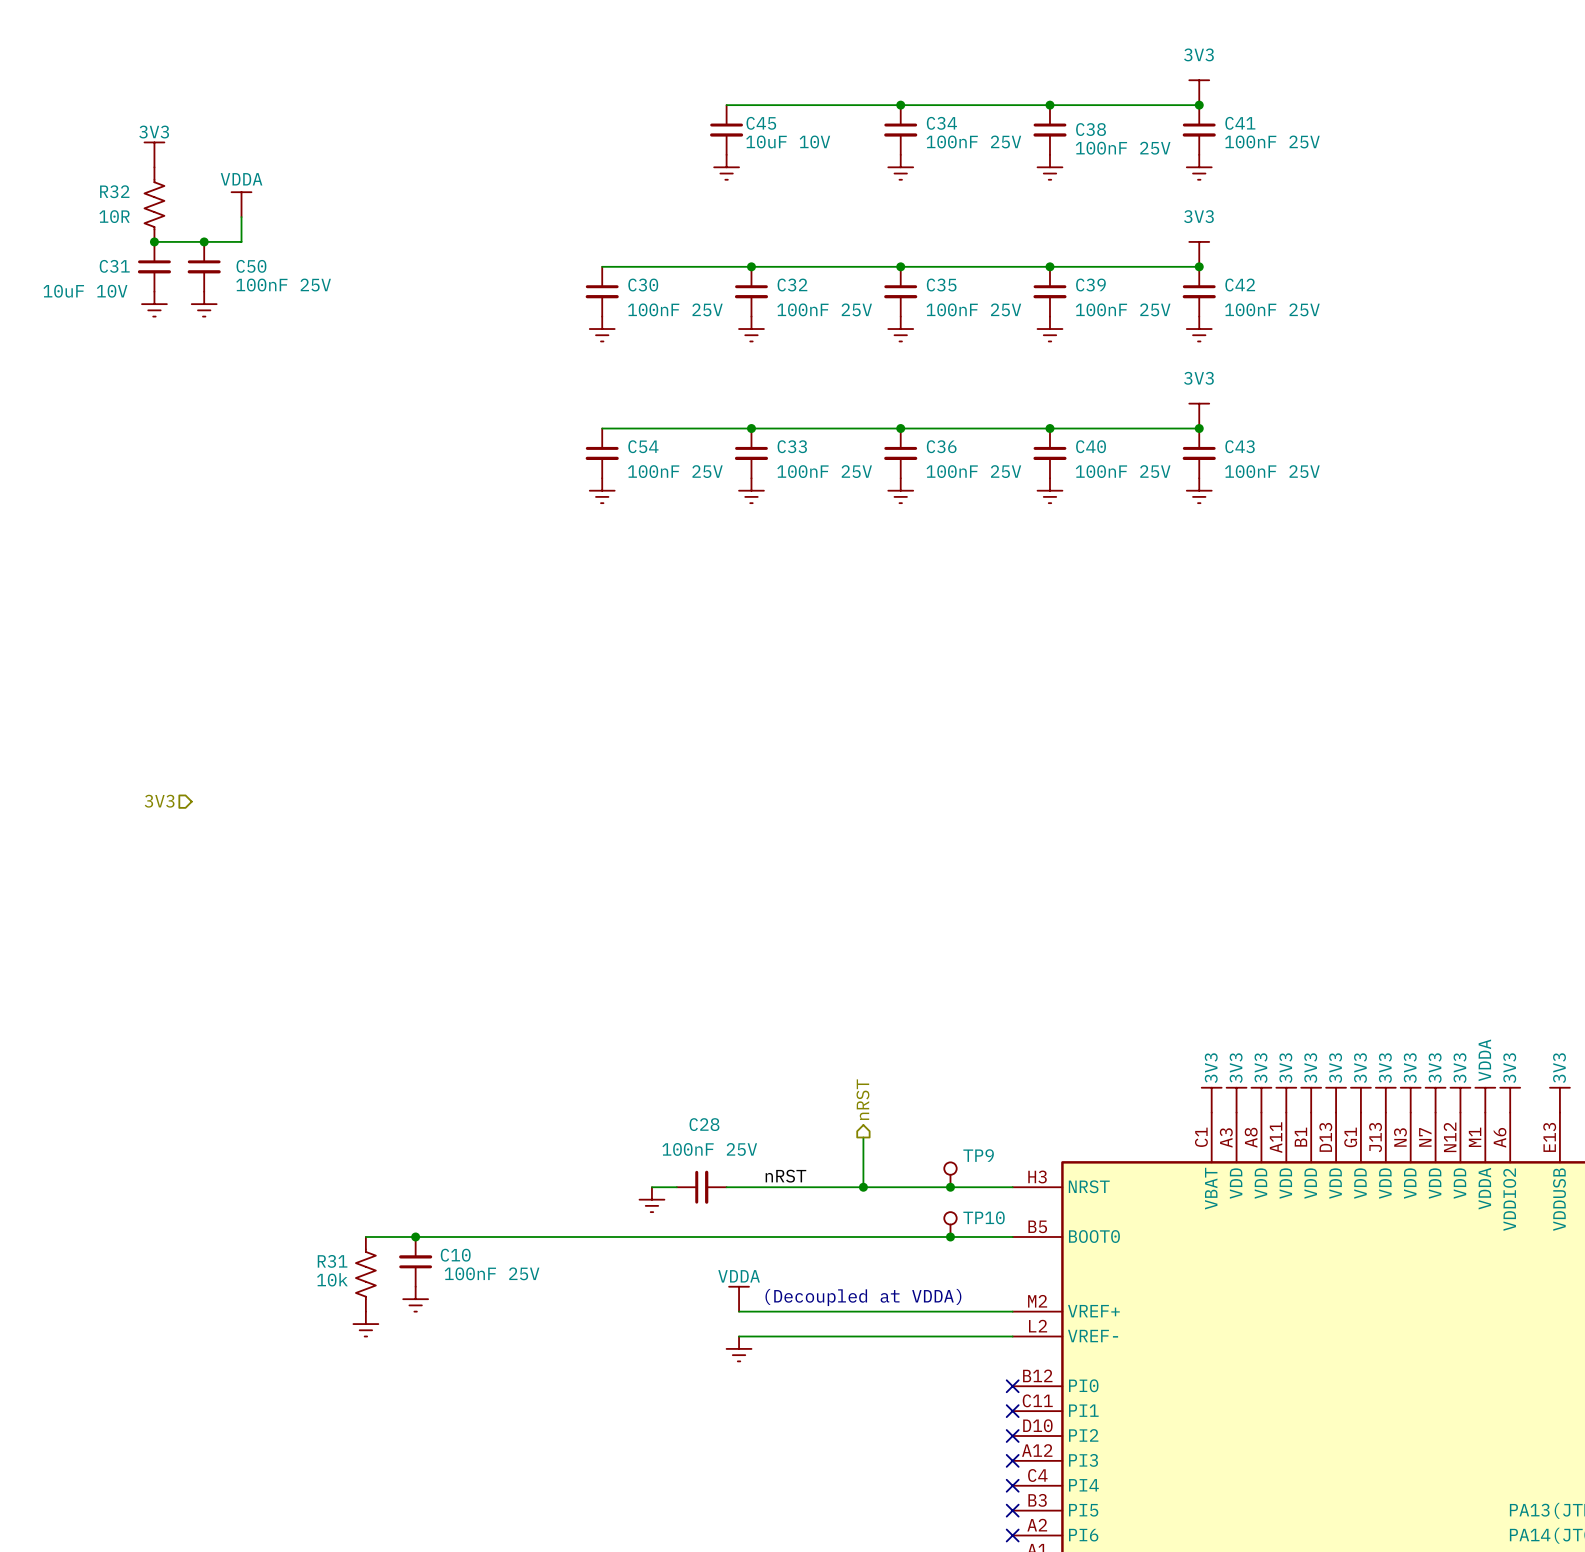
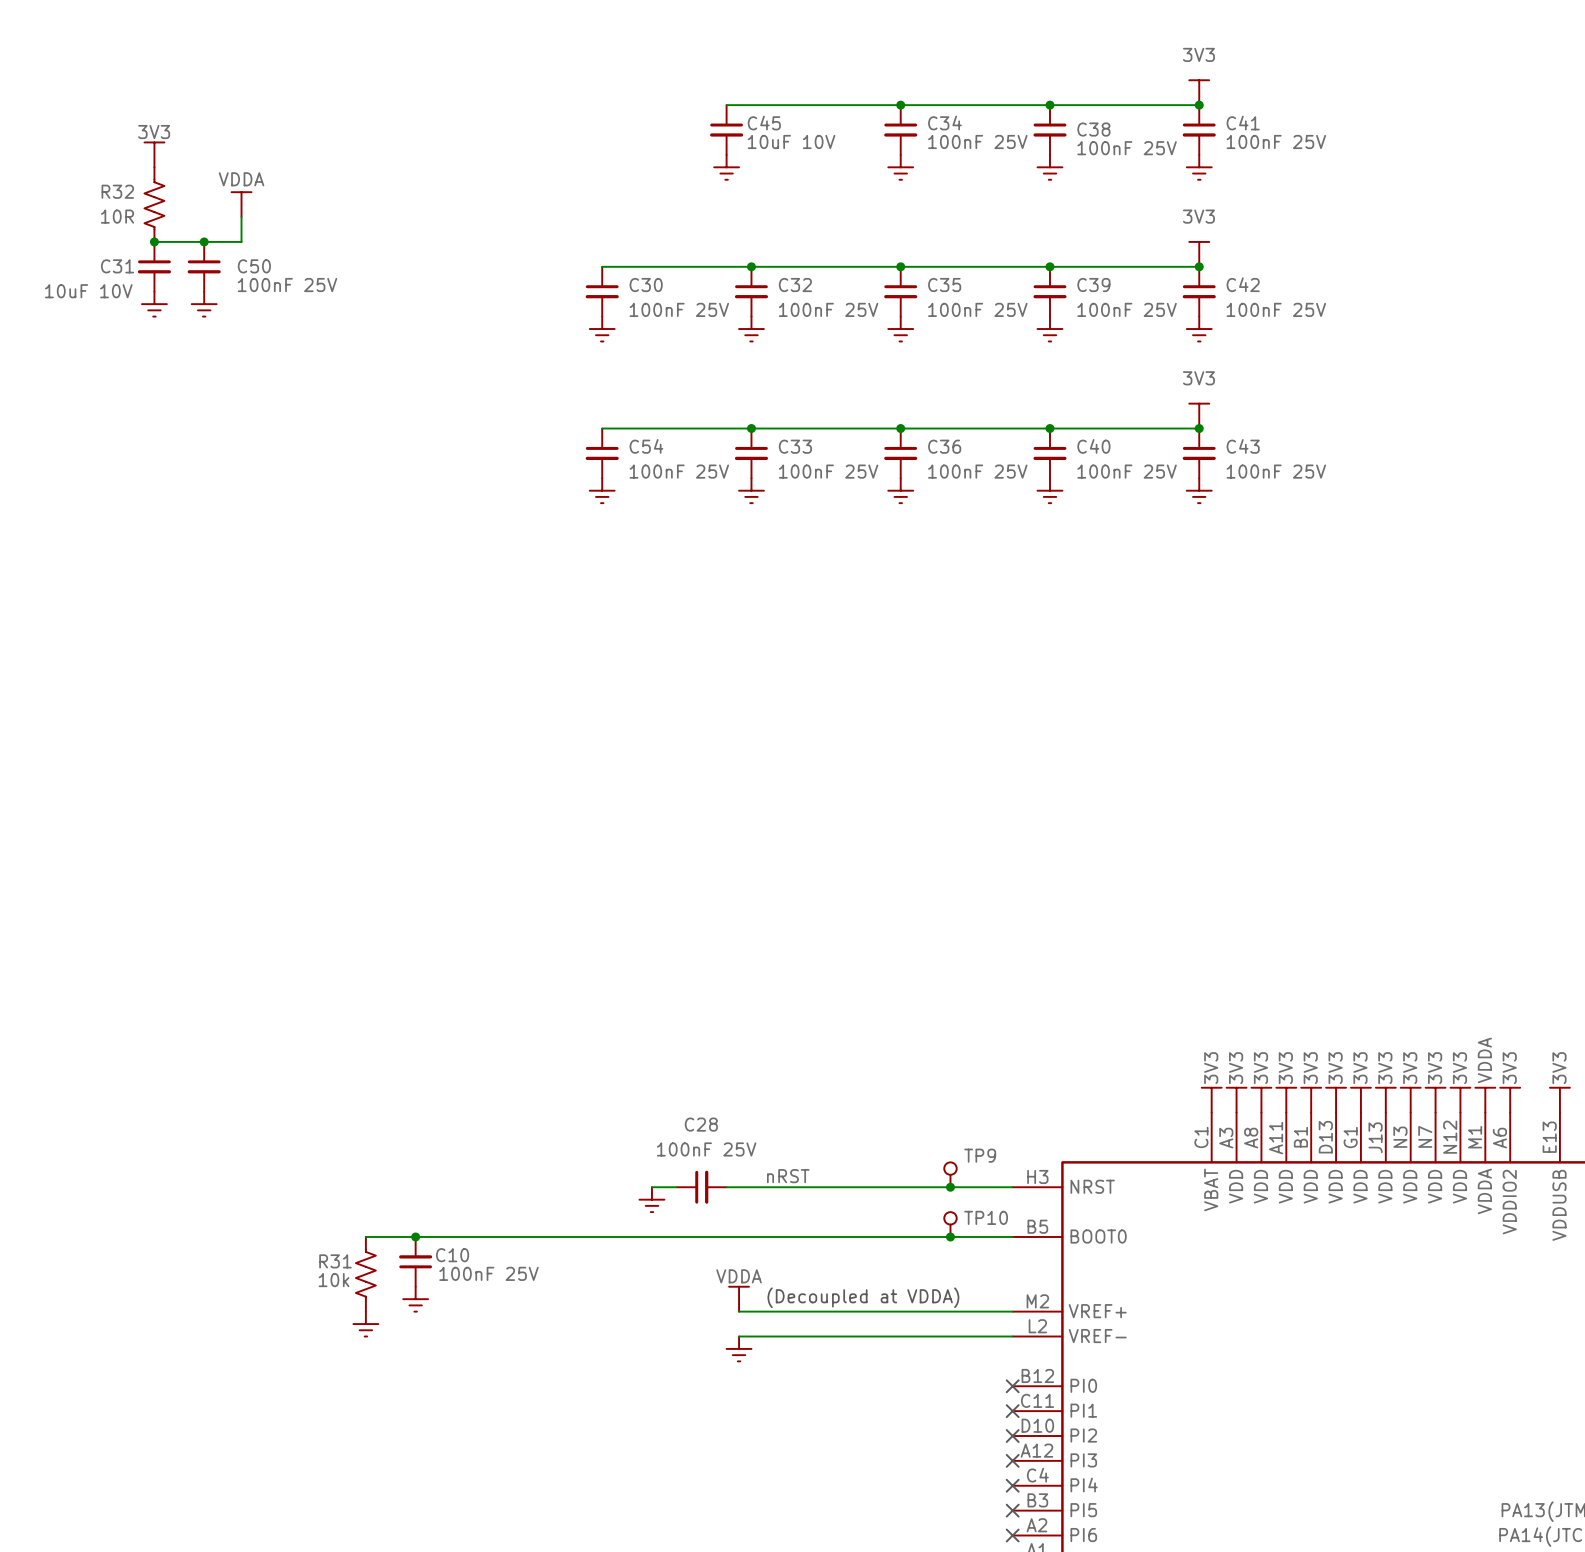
hierarchical label: 3V3 (159, 801) -> none
hierarchical label: nRST (862, 1099) -> none
wire: (863, 1137) (863, 1187) -> none
junction: (863, 1187) -> none

